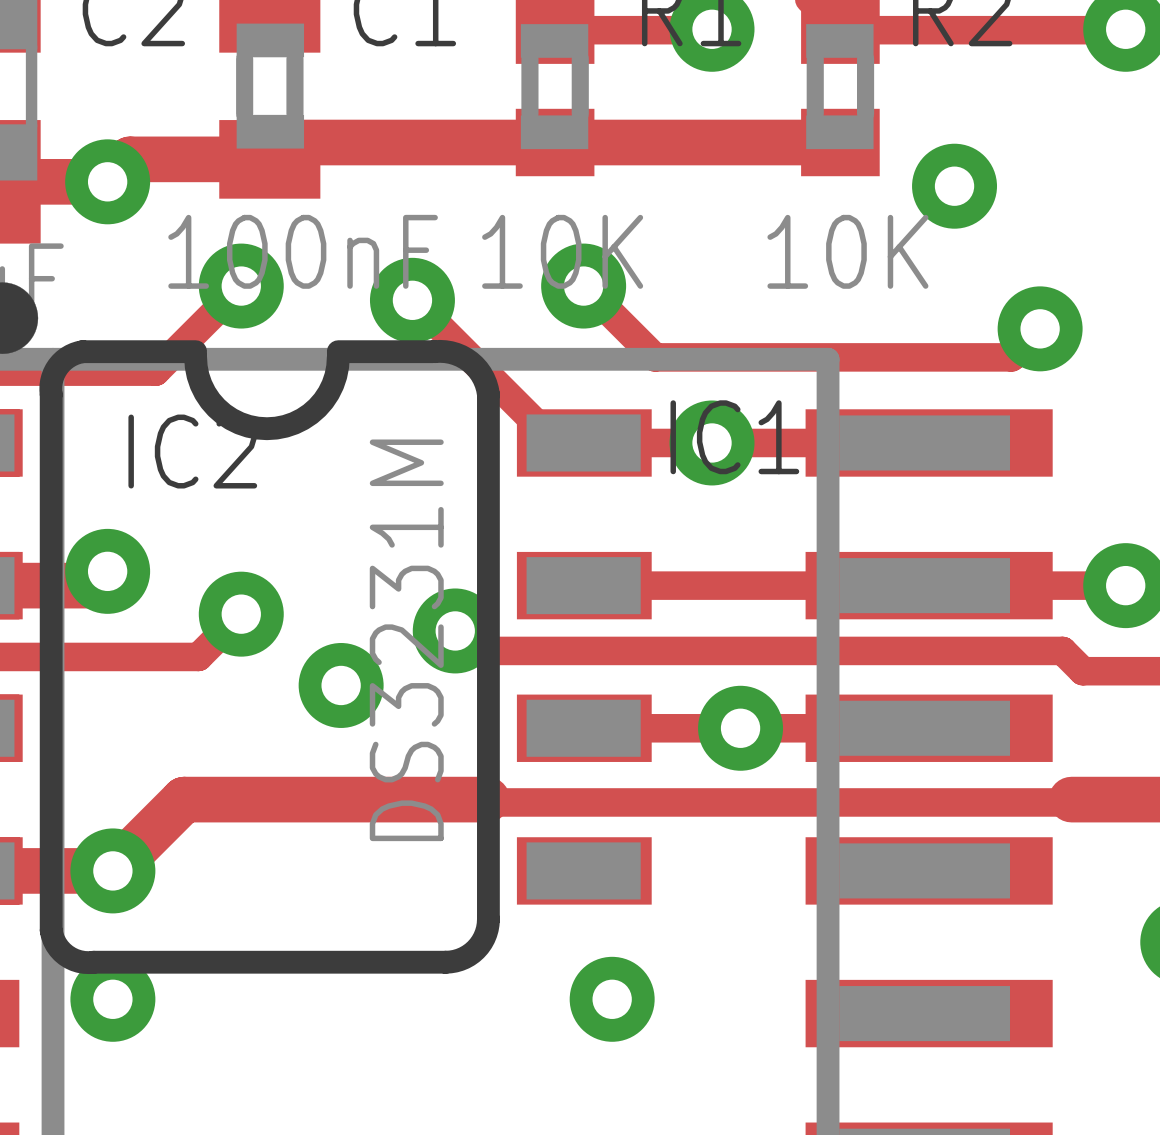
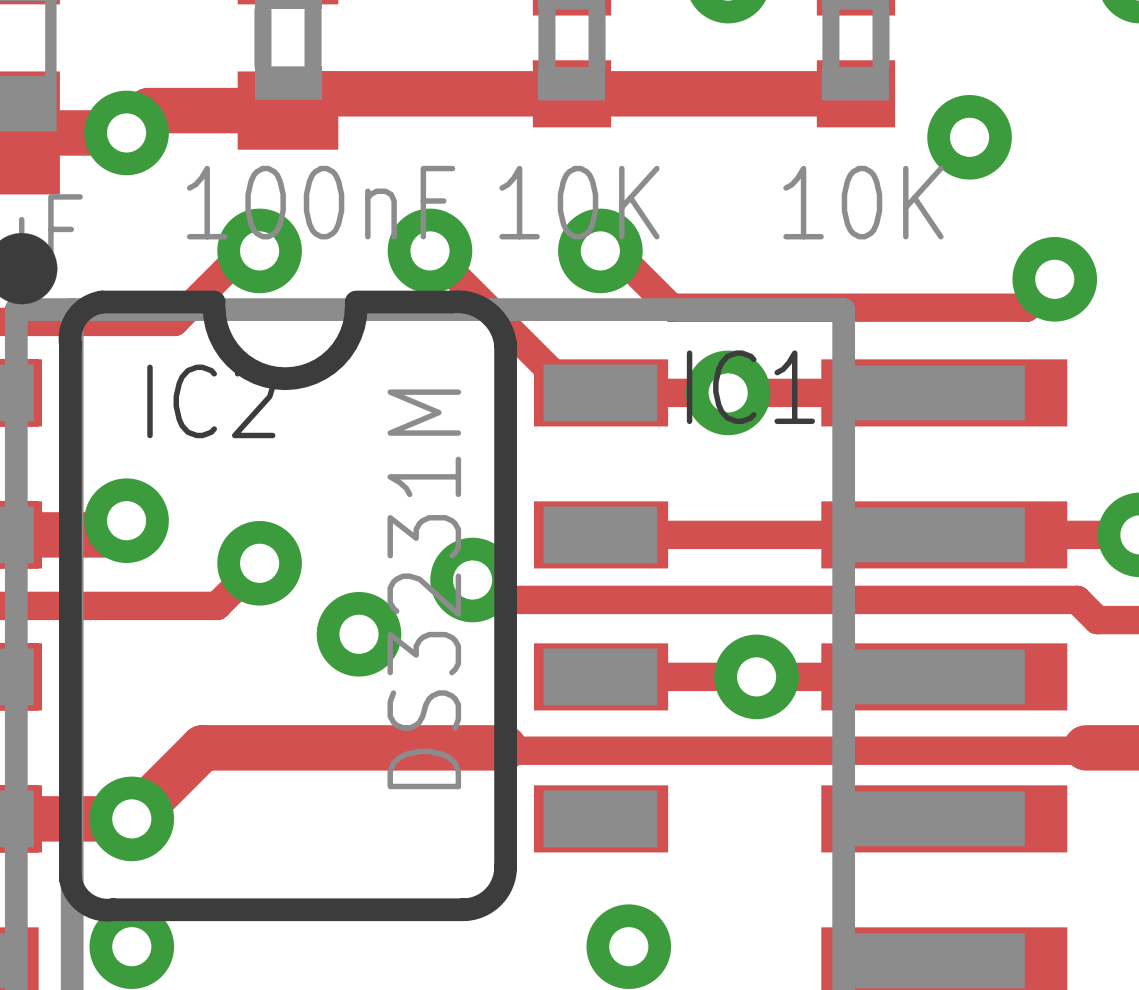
via position: (241, 286) -> (259, 250)
via position: (583, 286) -> (600, 250)

